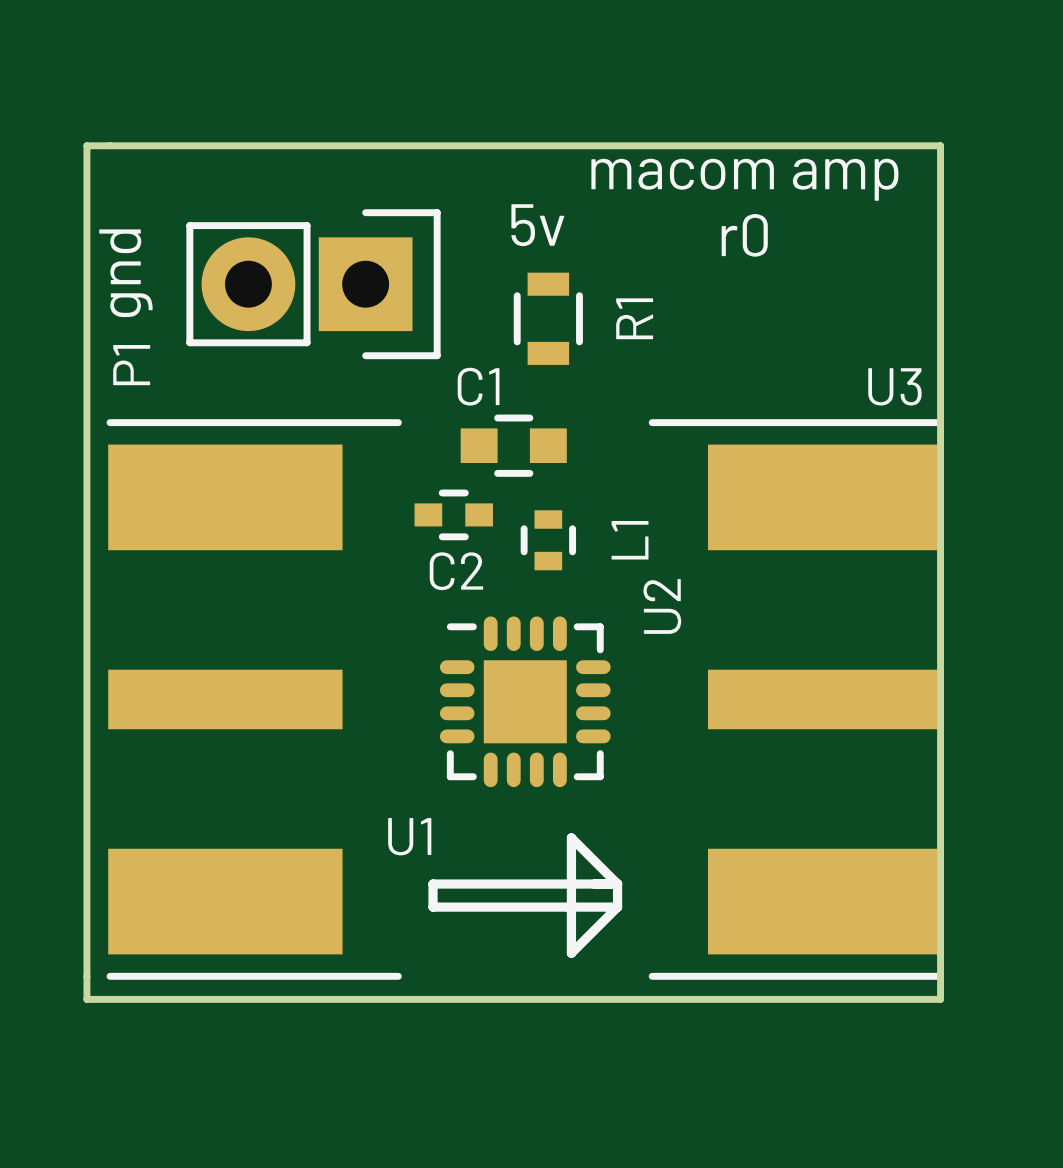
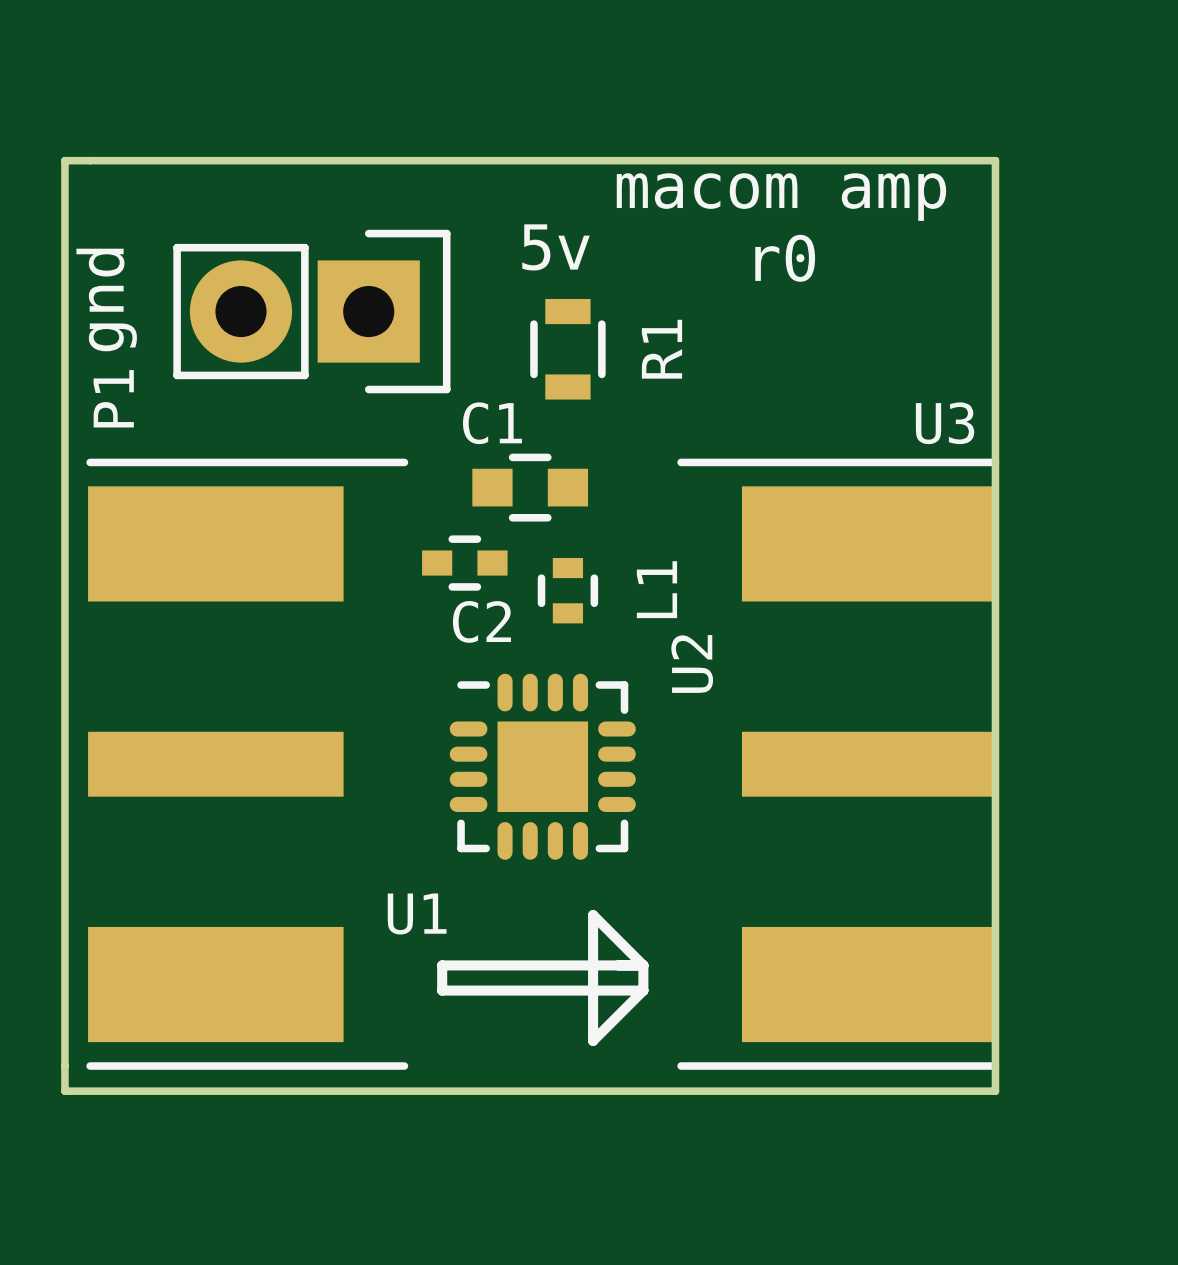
C2 name position: C2 (456, 571) -> C2 (481, 621)

